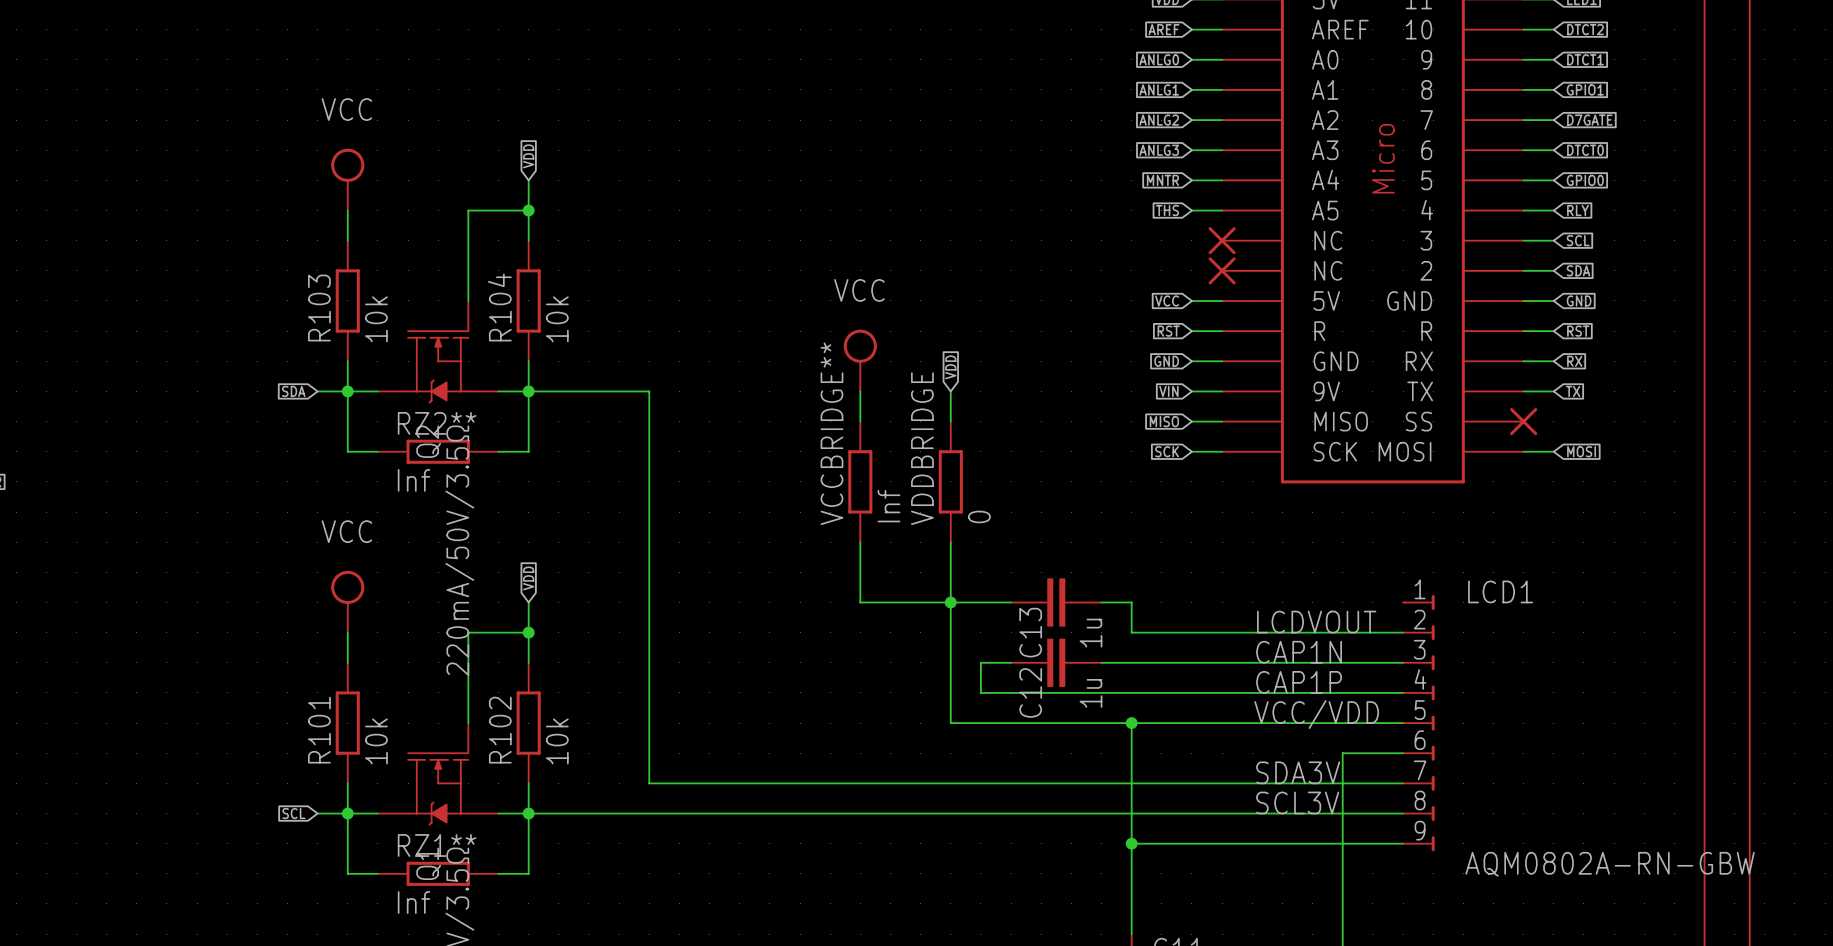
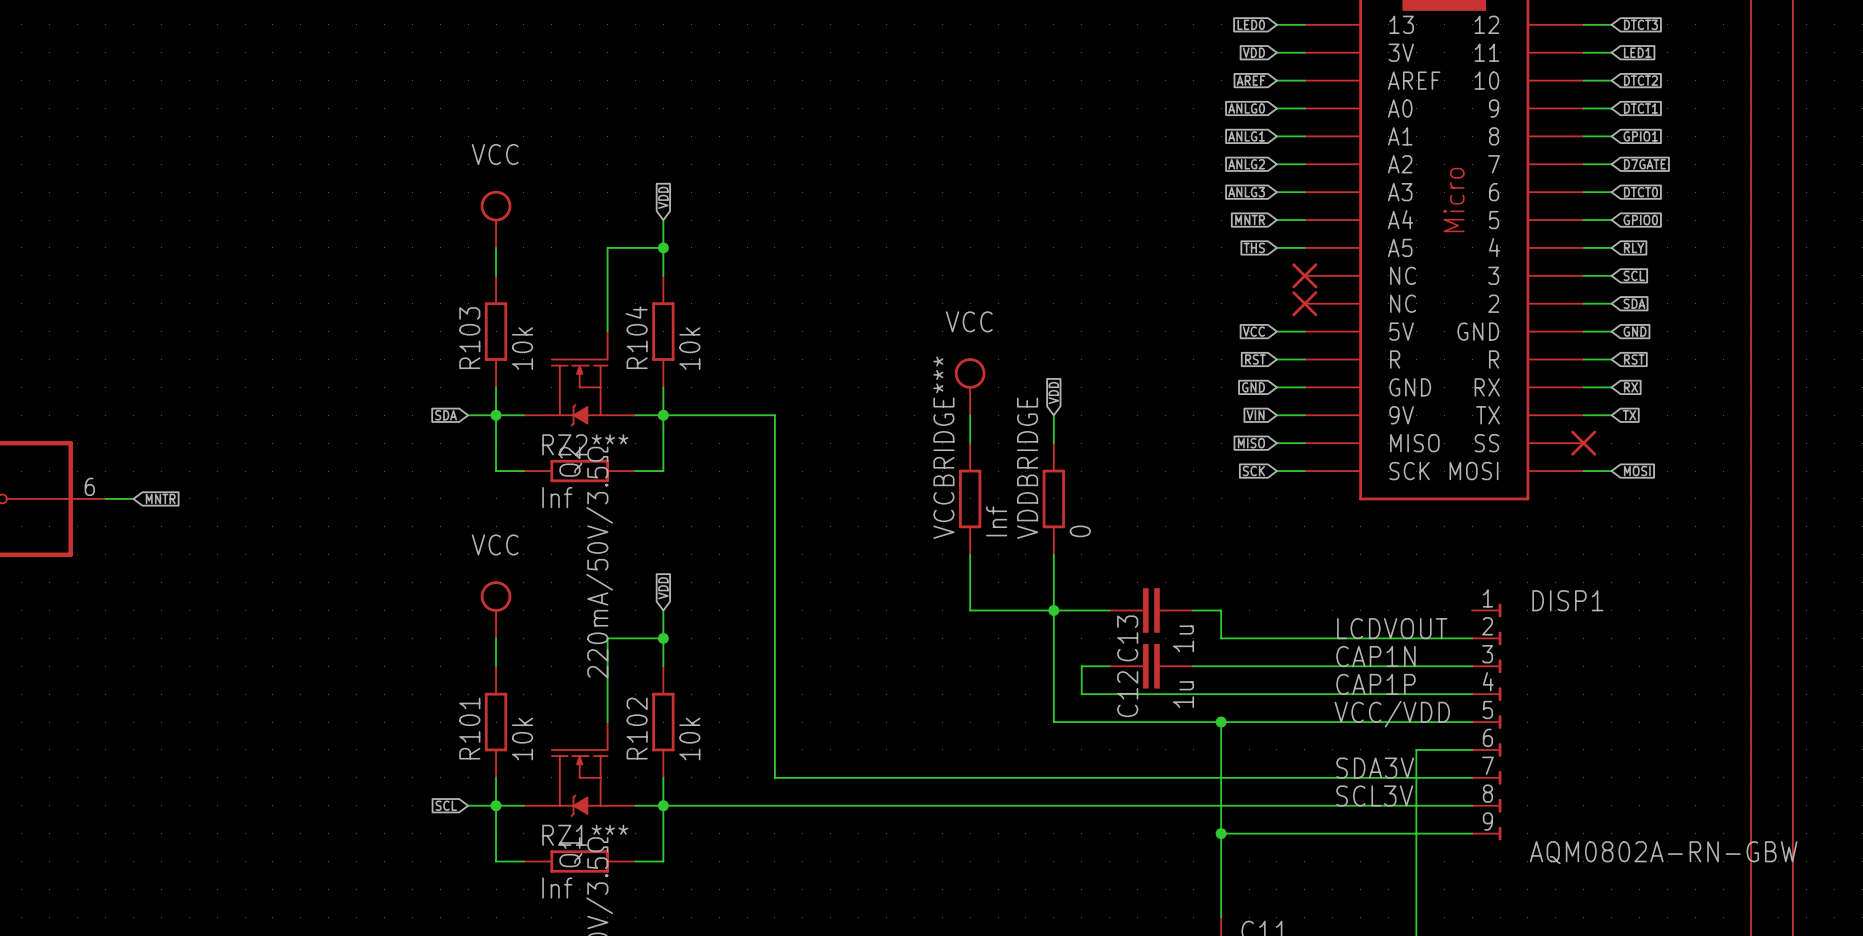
RZ2** name: RZ2** (437, 423) -> RZ2*** (585, 444)
VCCBRIDGE** name: VCCBRIDGE** (831, 433) -> VCCBRIDGE*** (943, 447)
LCD1 name: LCD1 (1500, 591) -> DISP1 (1567, 600)
RZ1** name: RZ1** (437, 845) -> RZ1*** (585, 835)

